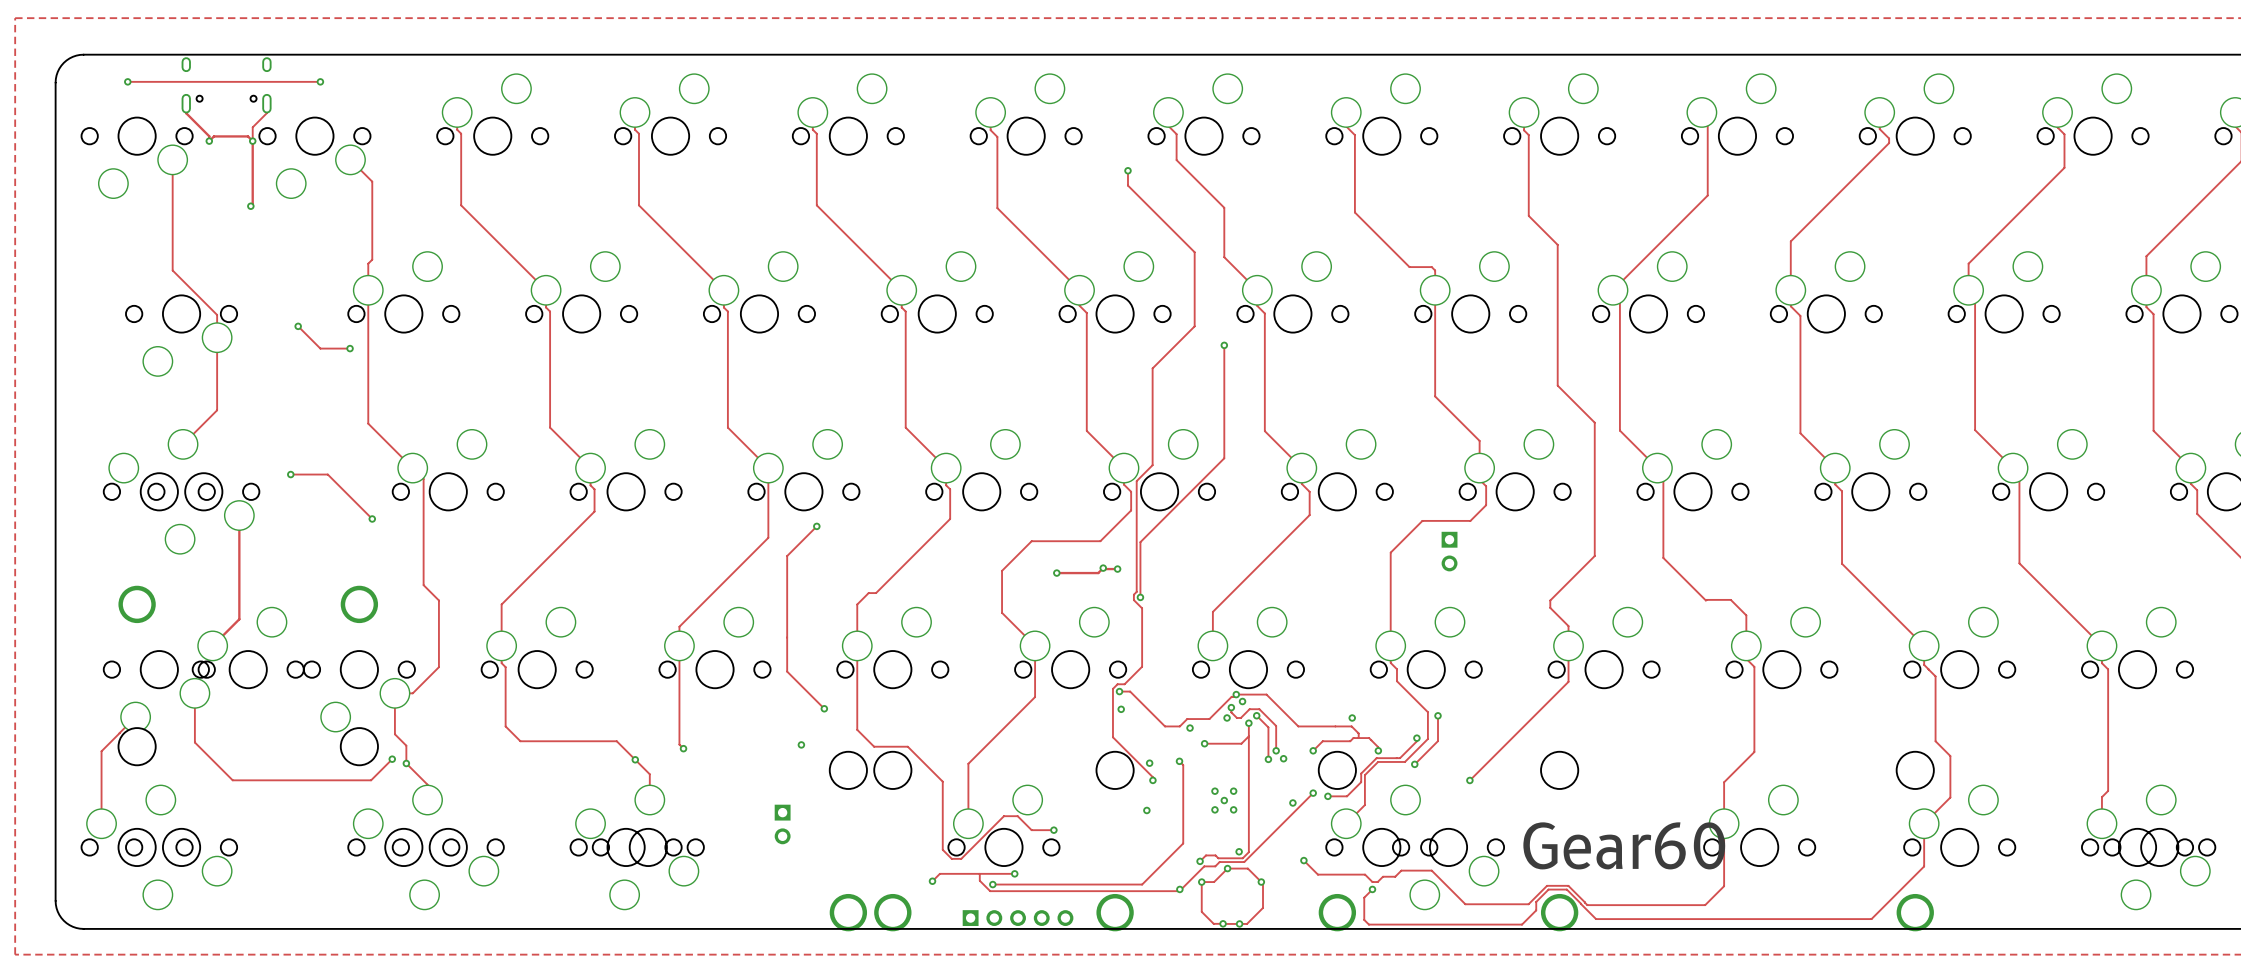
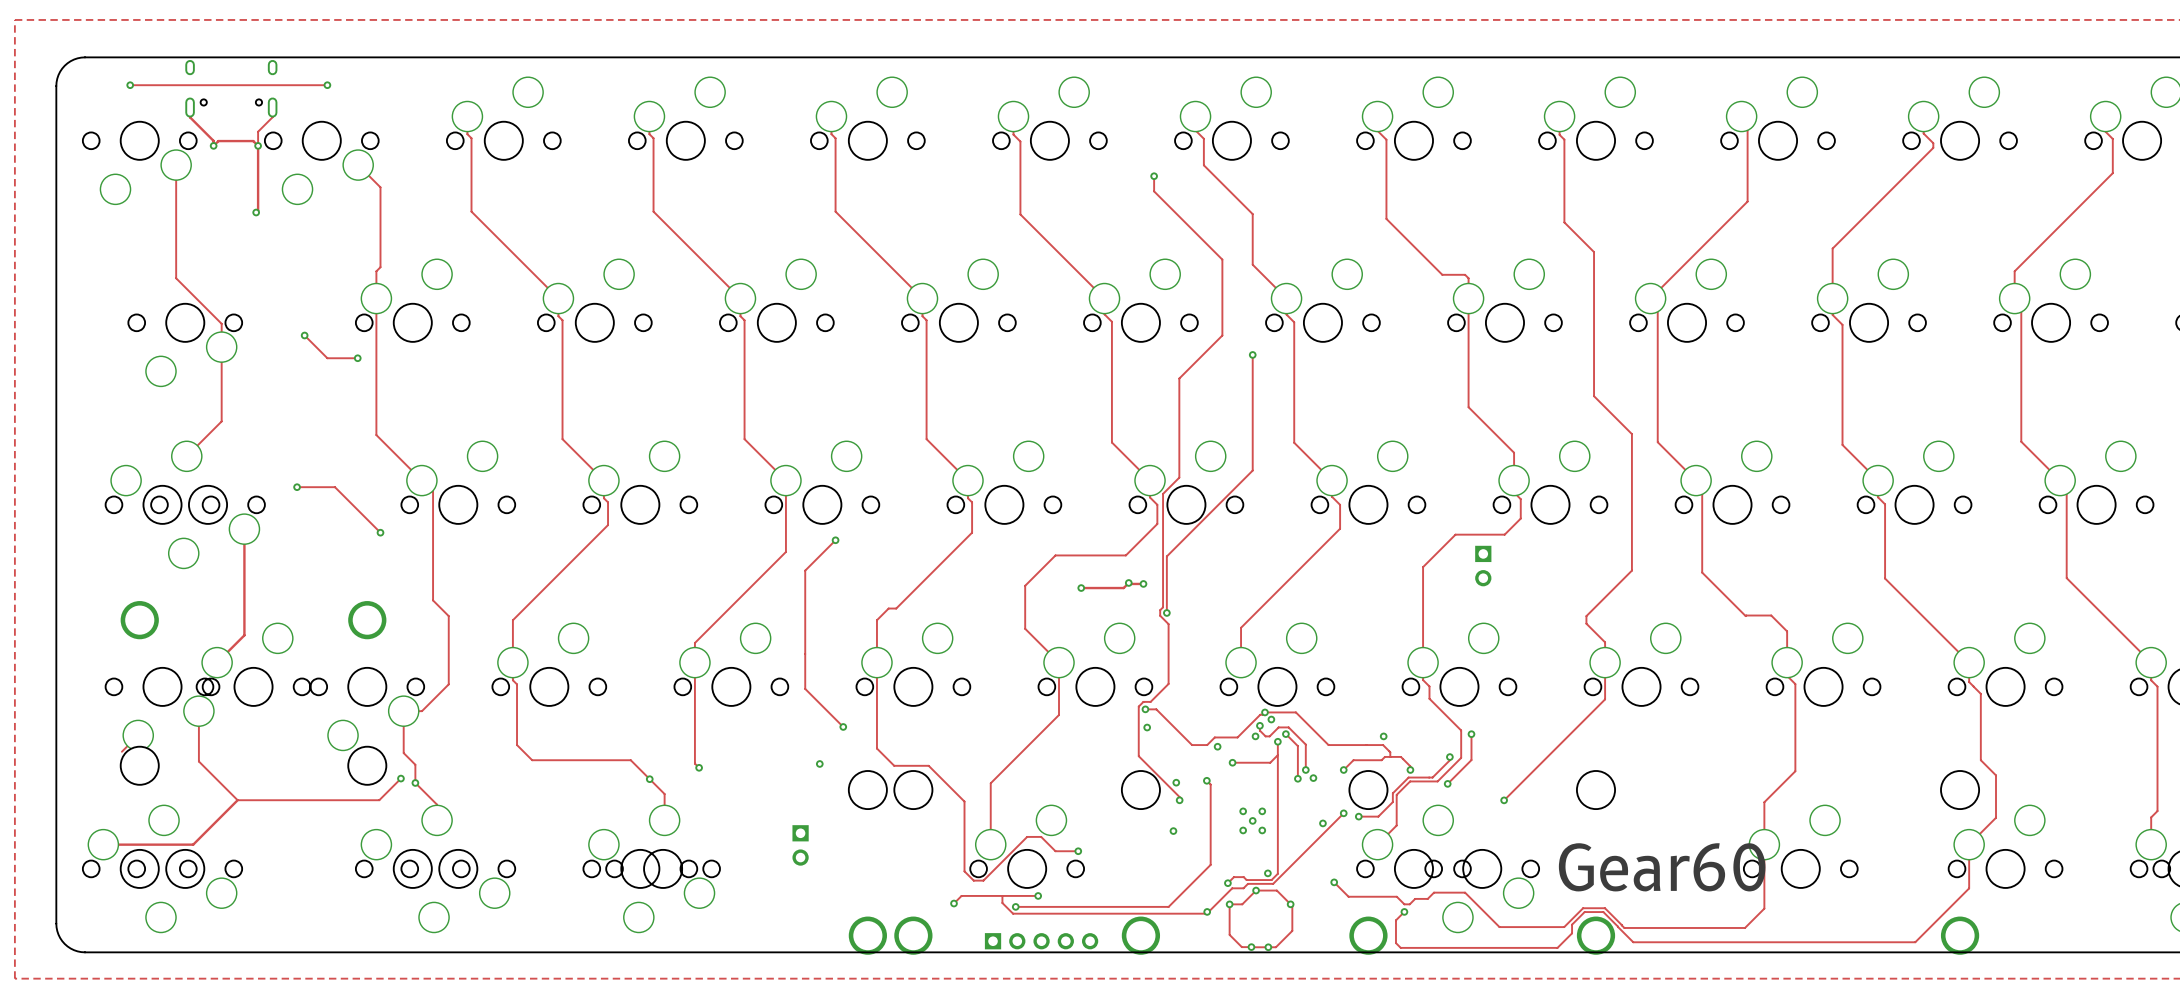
track: (119, 733) (101, 751) (101, 823) -> (237, 800) (193, 844) (103, 844)

